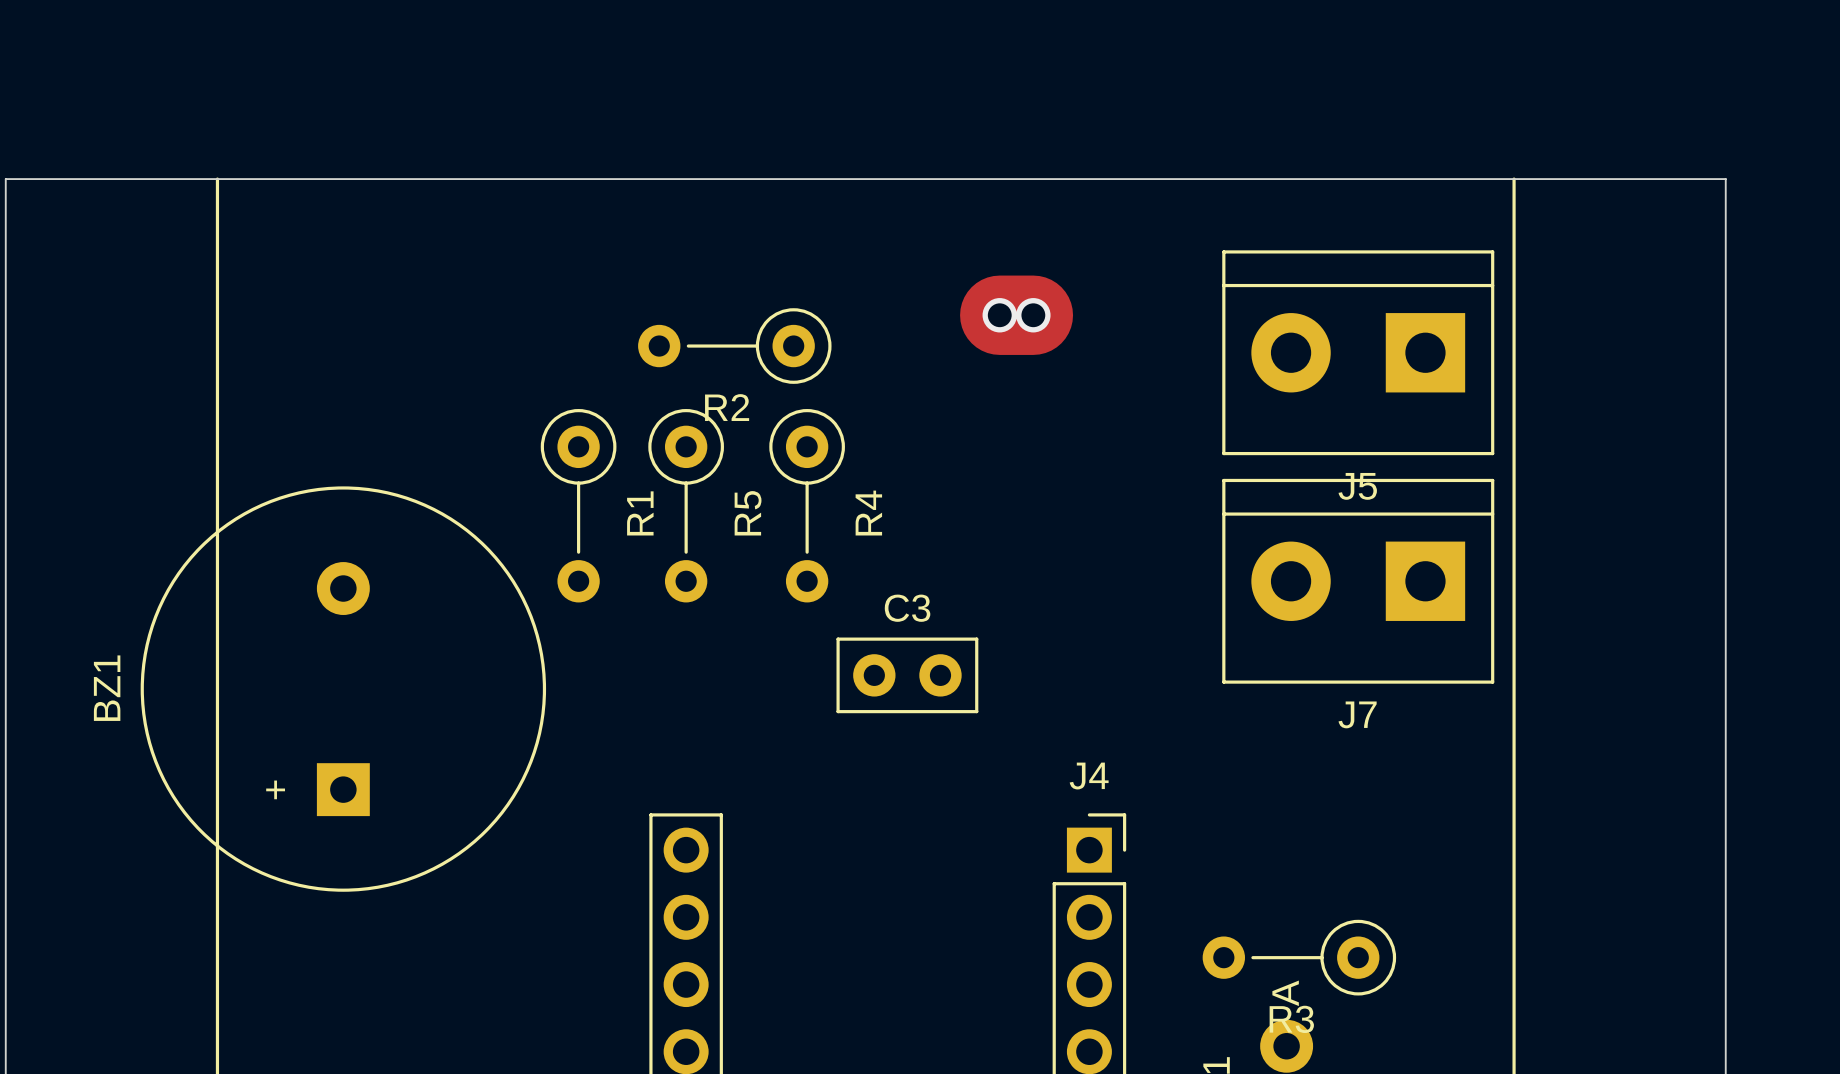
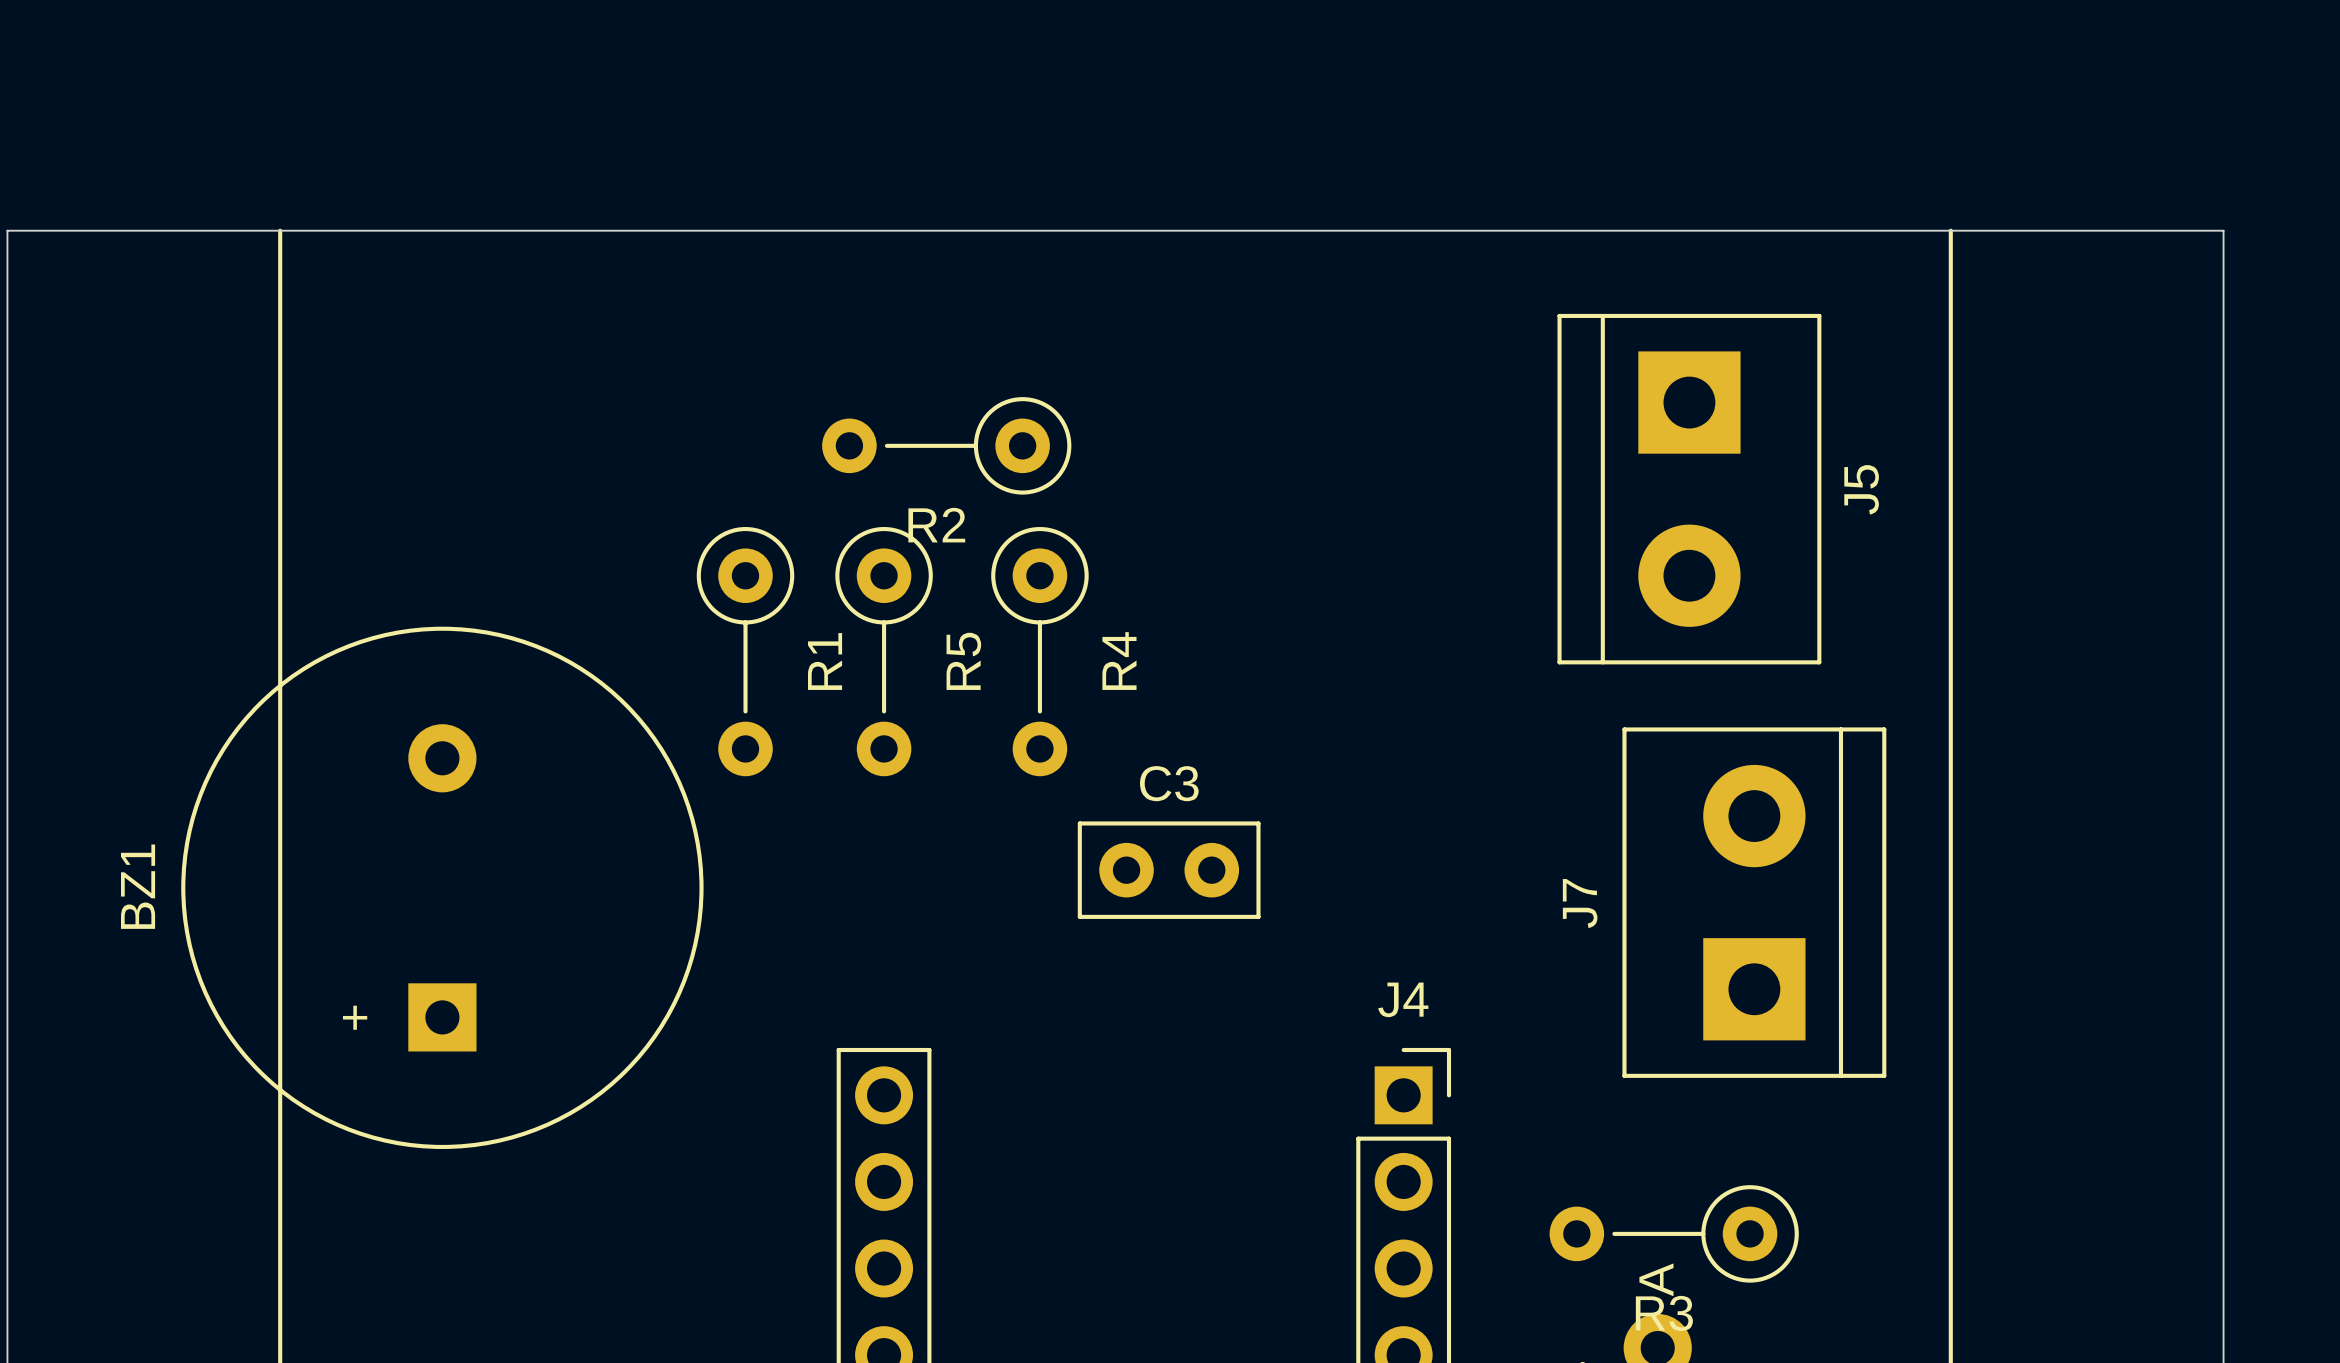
track: (999, 315) (1033, 315) -> none
via: (999, 315) -> none
via: (1033, 315) -> none
J5 rotation: 0° (1358, 352) -> 90° counterclockwise (1689, 489)
J7 rotation: 0° (1358, 581) -> 90° clockwise (1754, 902)

